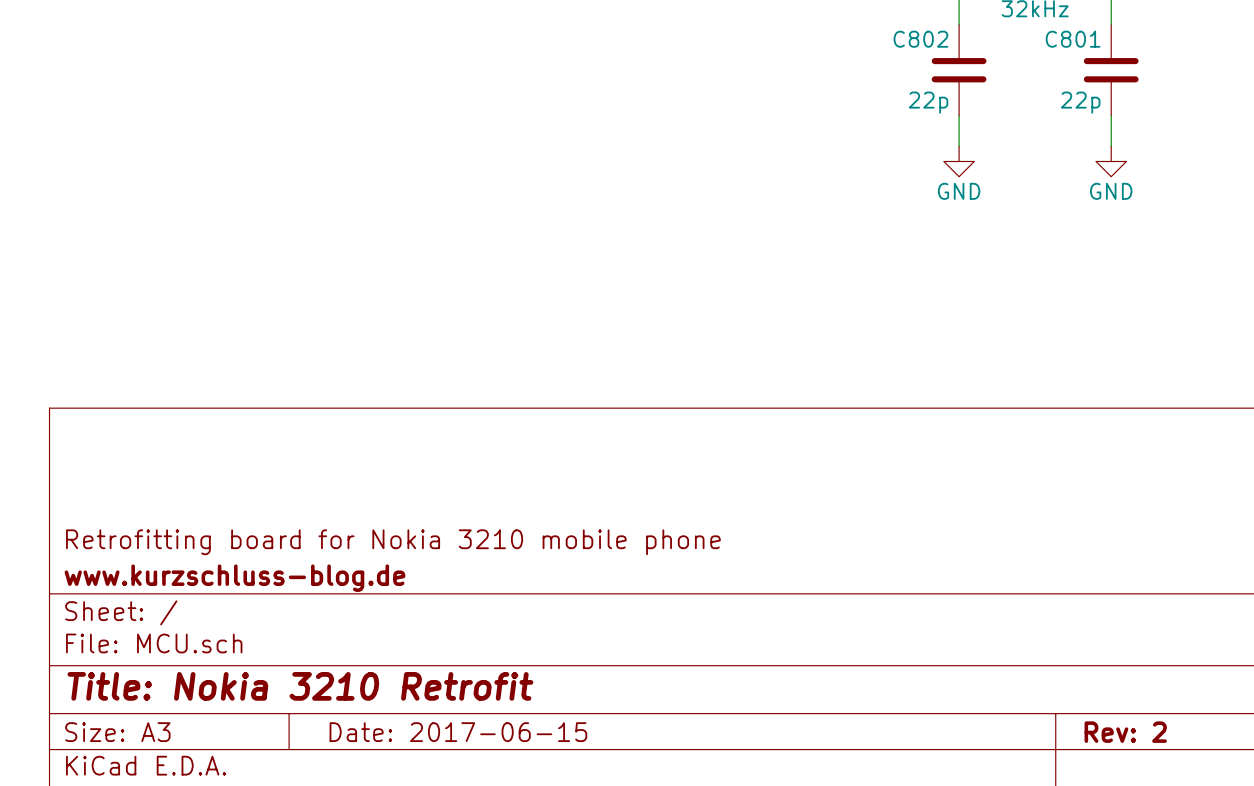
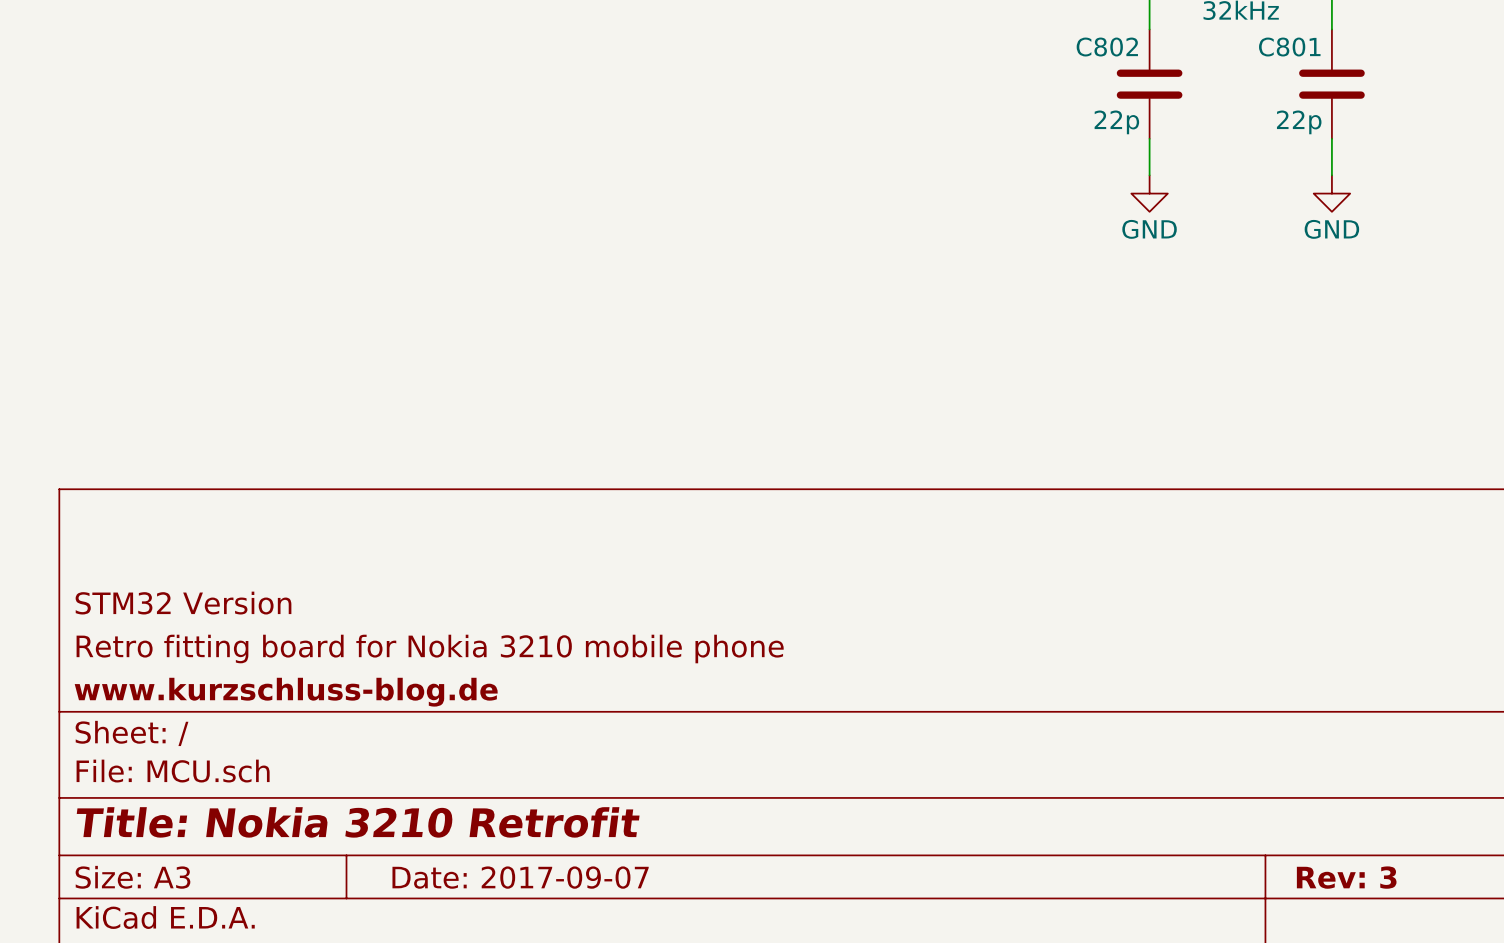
title block: none -> STM32 Version (183, 603)
title block: Retrofitting board for Nokia 3210 mobile phone (393, 542) -> Retro fitting board for Nokia 3210 mobile phone (430, 649)
title block: Date: 2017-06-15 (458, 732) -> Date: 2017-09-07 (520, 877)
title block: Rev: 2 (1125, 732) -> Rev: 3 (1346, 877)

